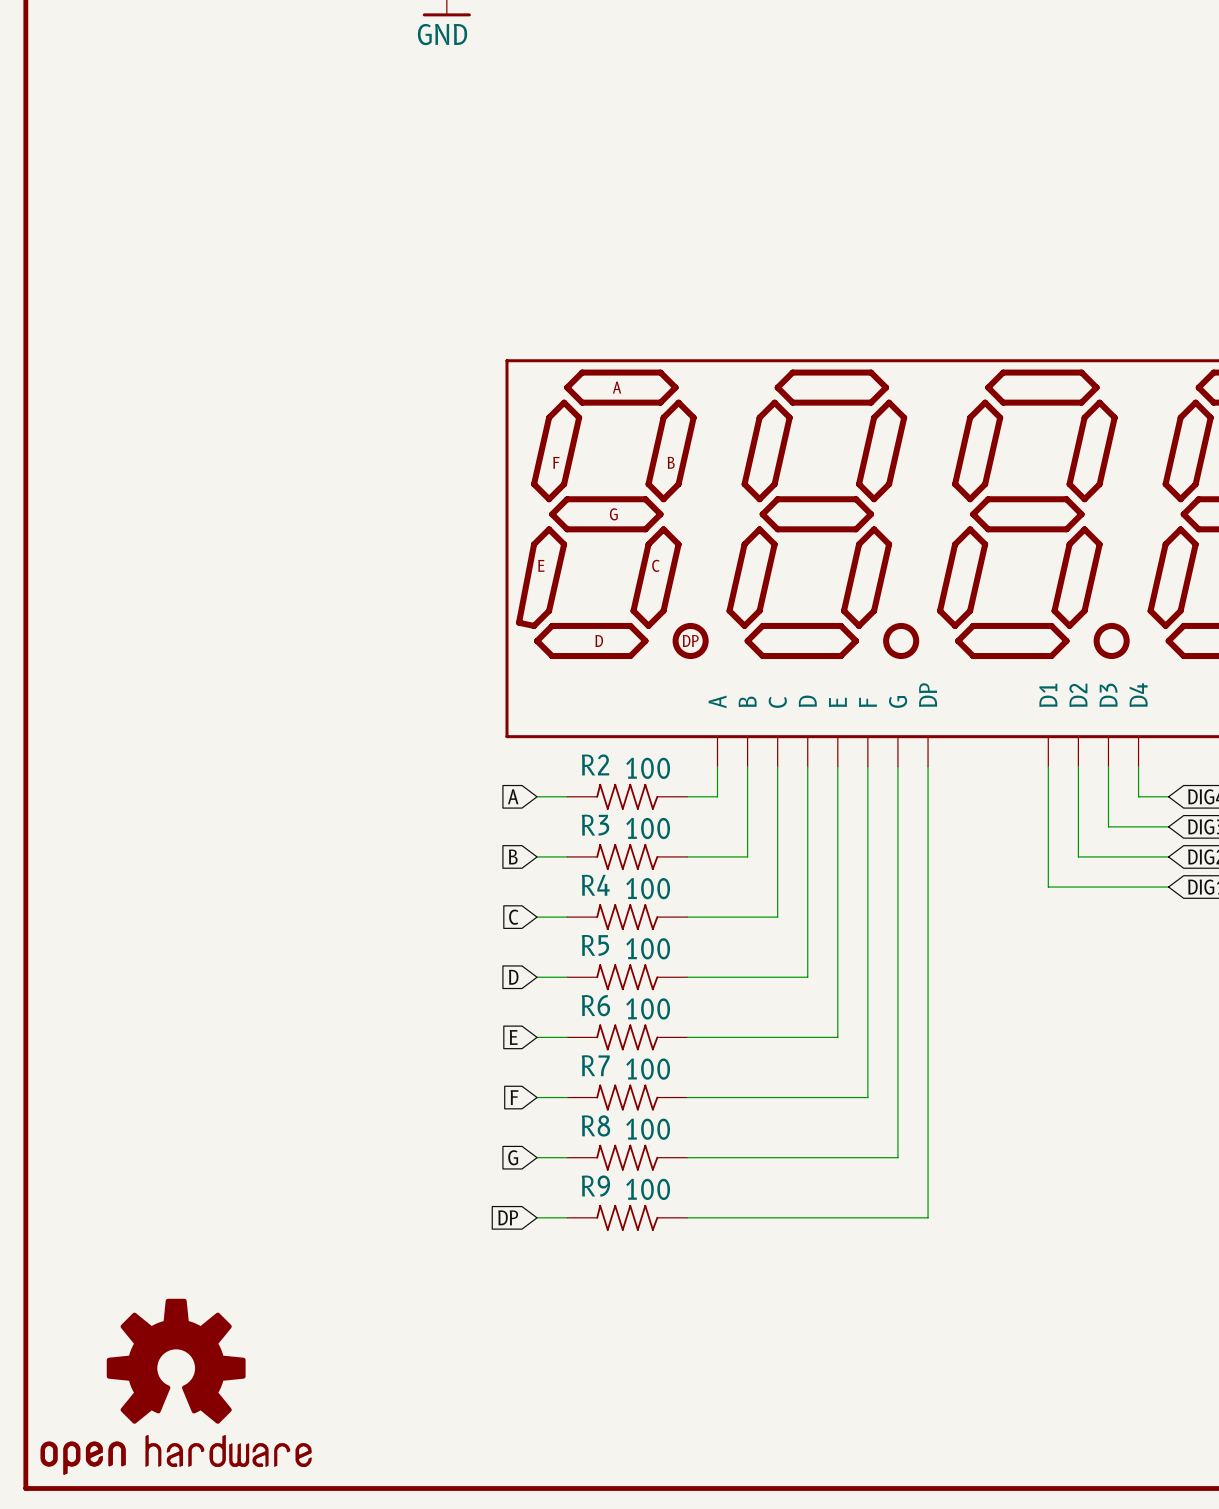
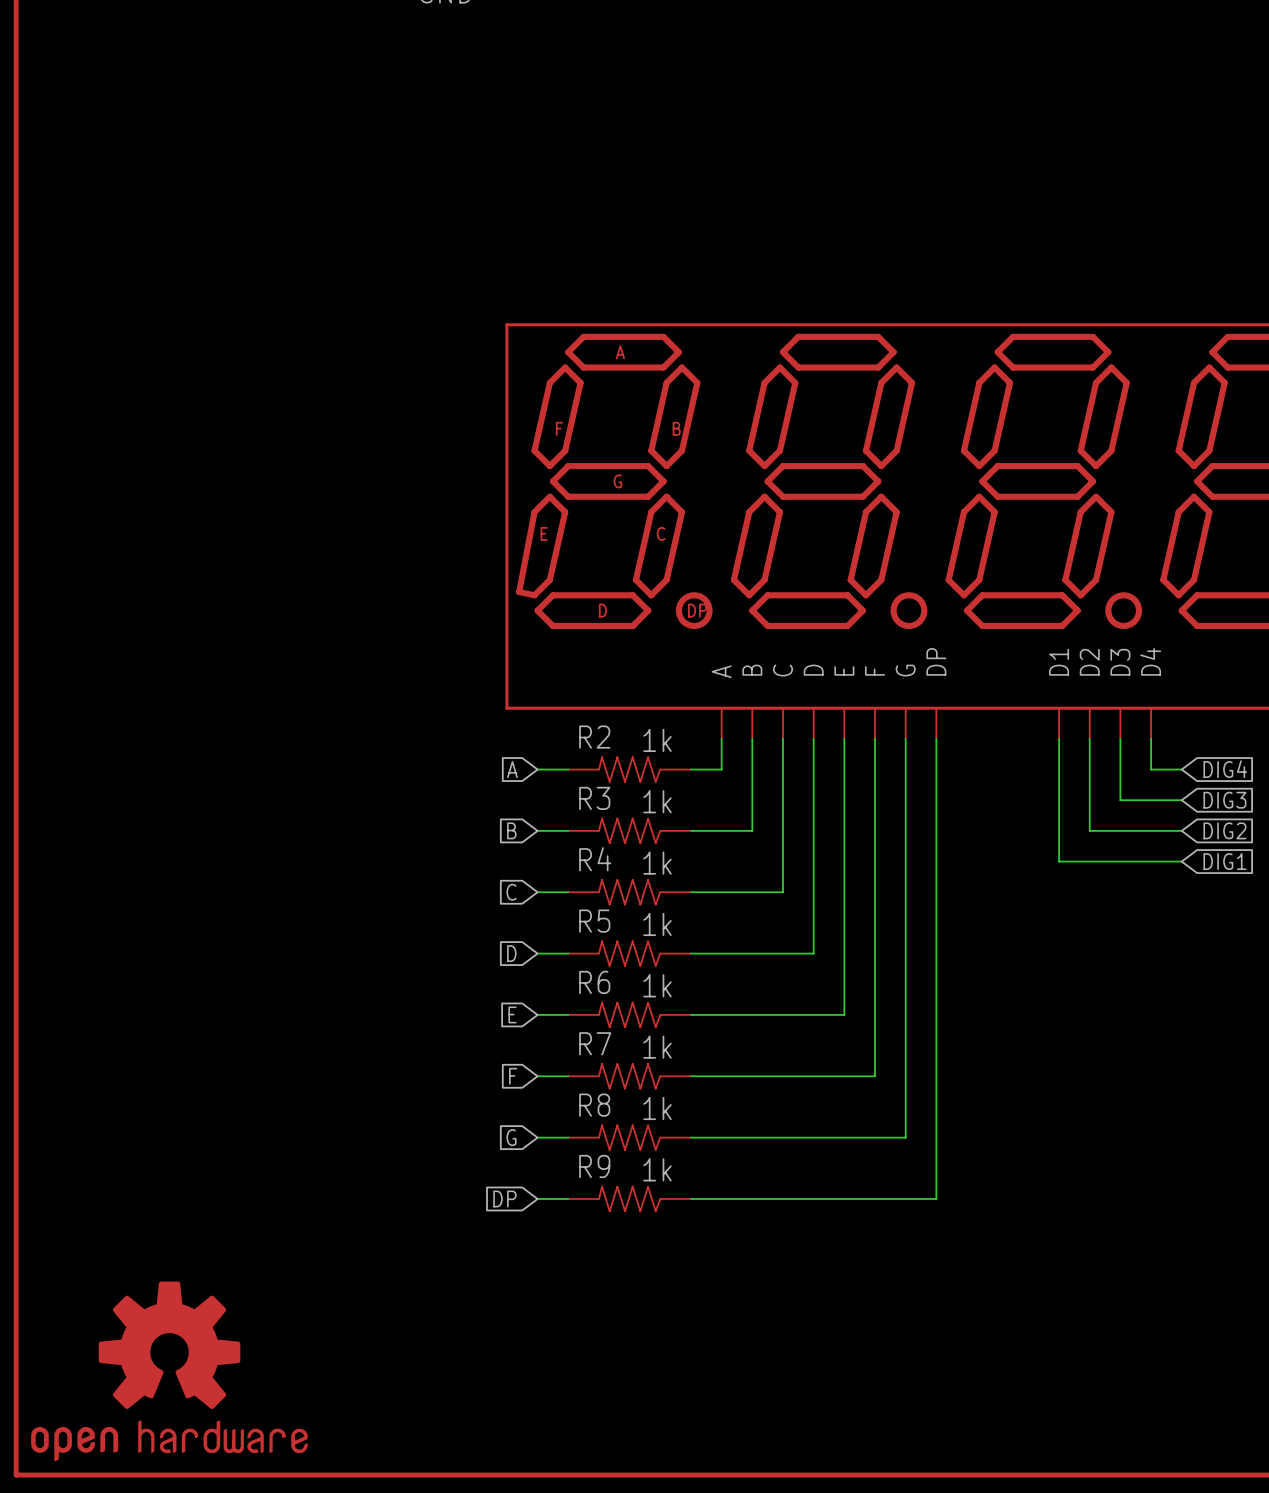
R2 value: 100 (648, 768) -> 1k (657, 740)
R3 value: 100 (648, 828) -> 1k (657, 801)
R4 value: 100 (648, 888) -> 1k (657, 863)
R5 value: 100 (648, 948) -> 1k (657, 924)
R6 value: 100 (648, 1008) -> 1k (657, 985)
R7 value: 100 (648, 1069) -> 1k (657, 1047)
R8 value: 100 (648, 1129) -> 1k (657, 1108)
R9 value: 100 (648, 1189) -> 1k (657, 1169)

